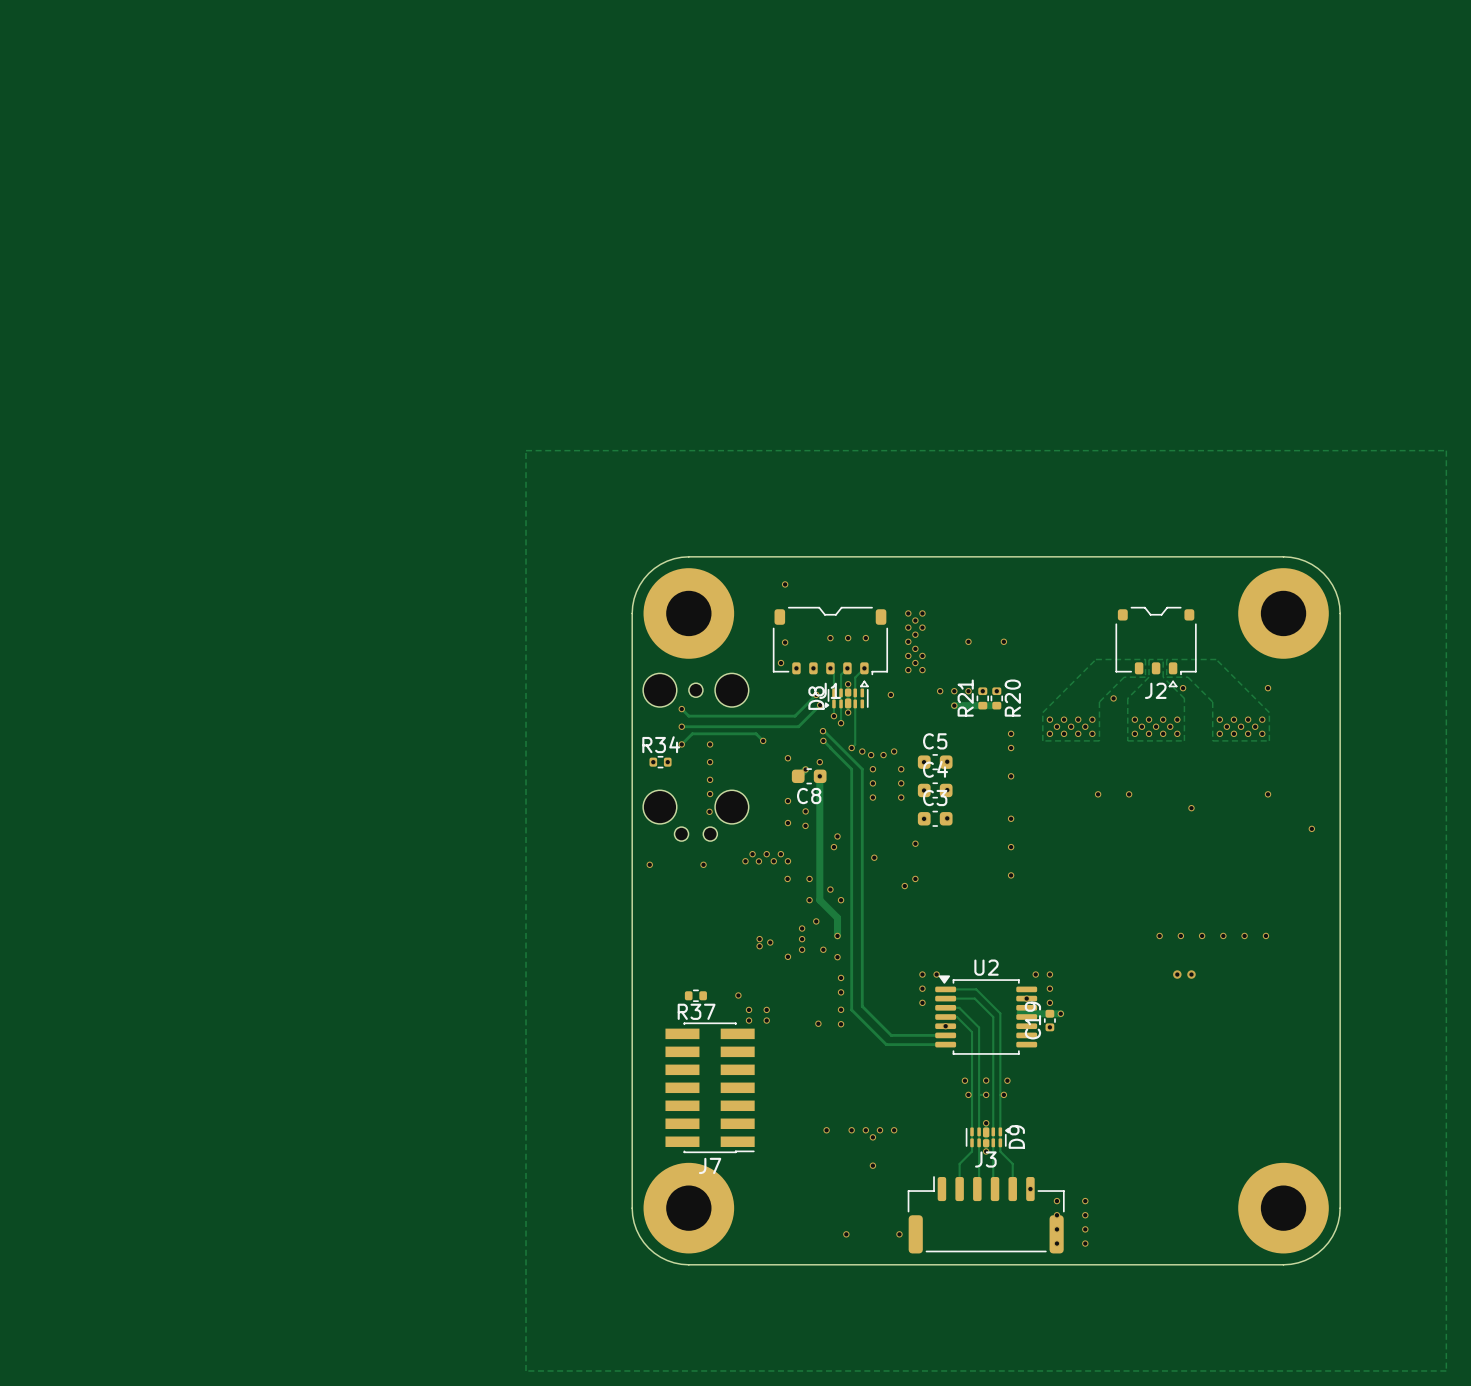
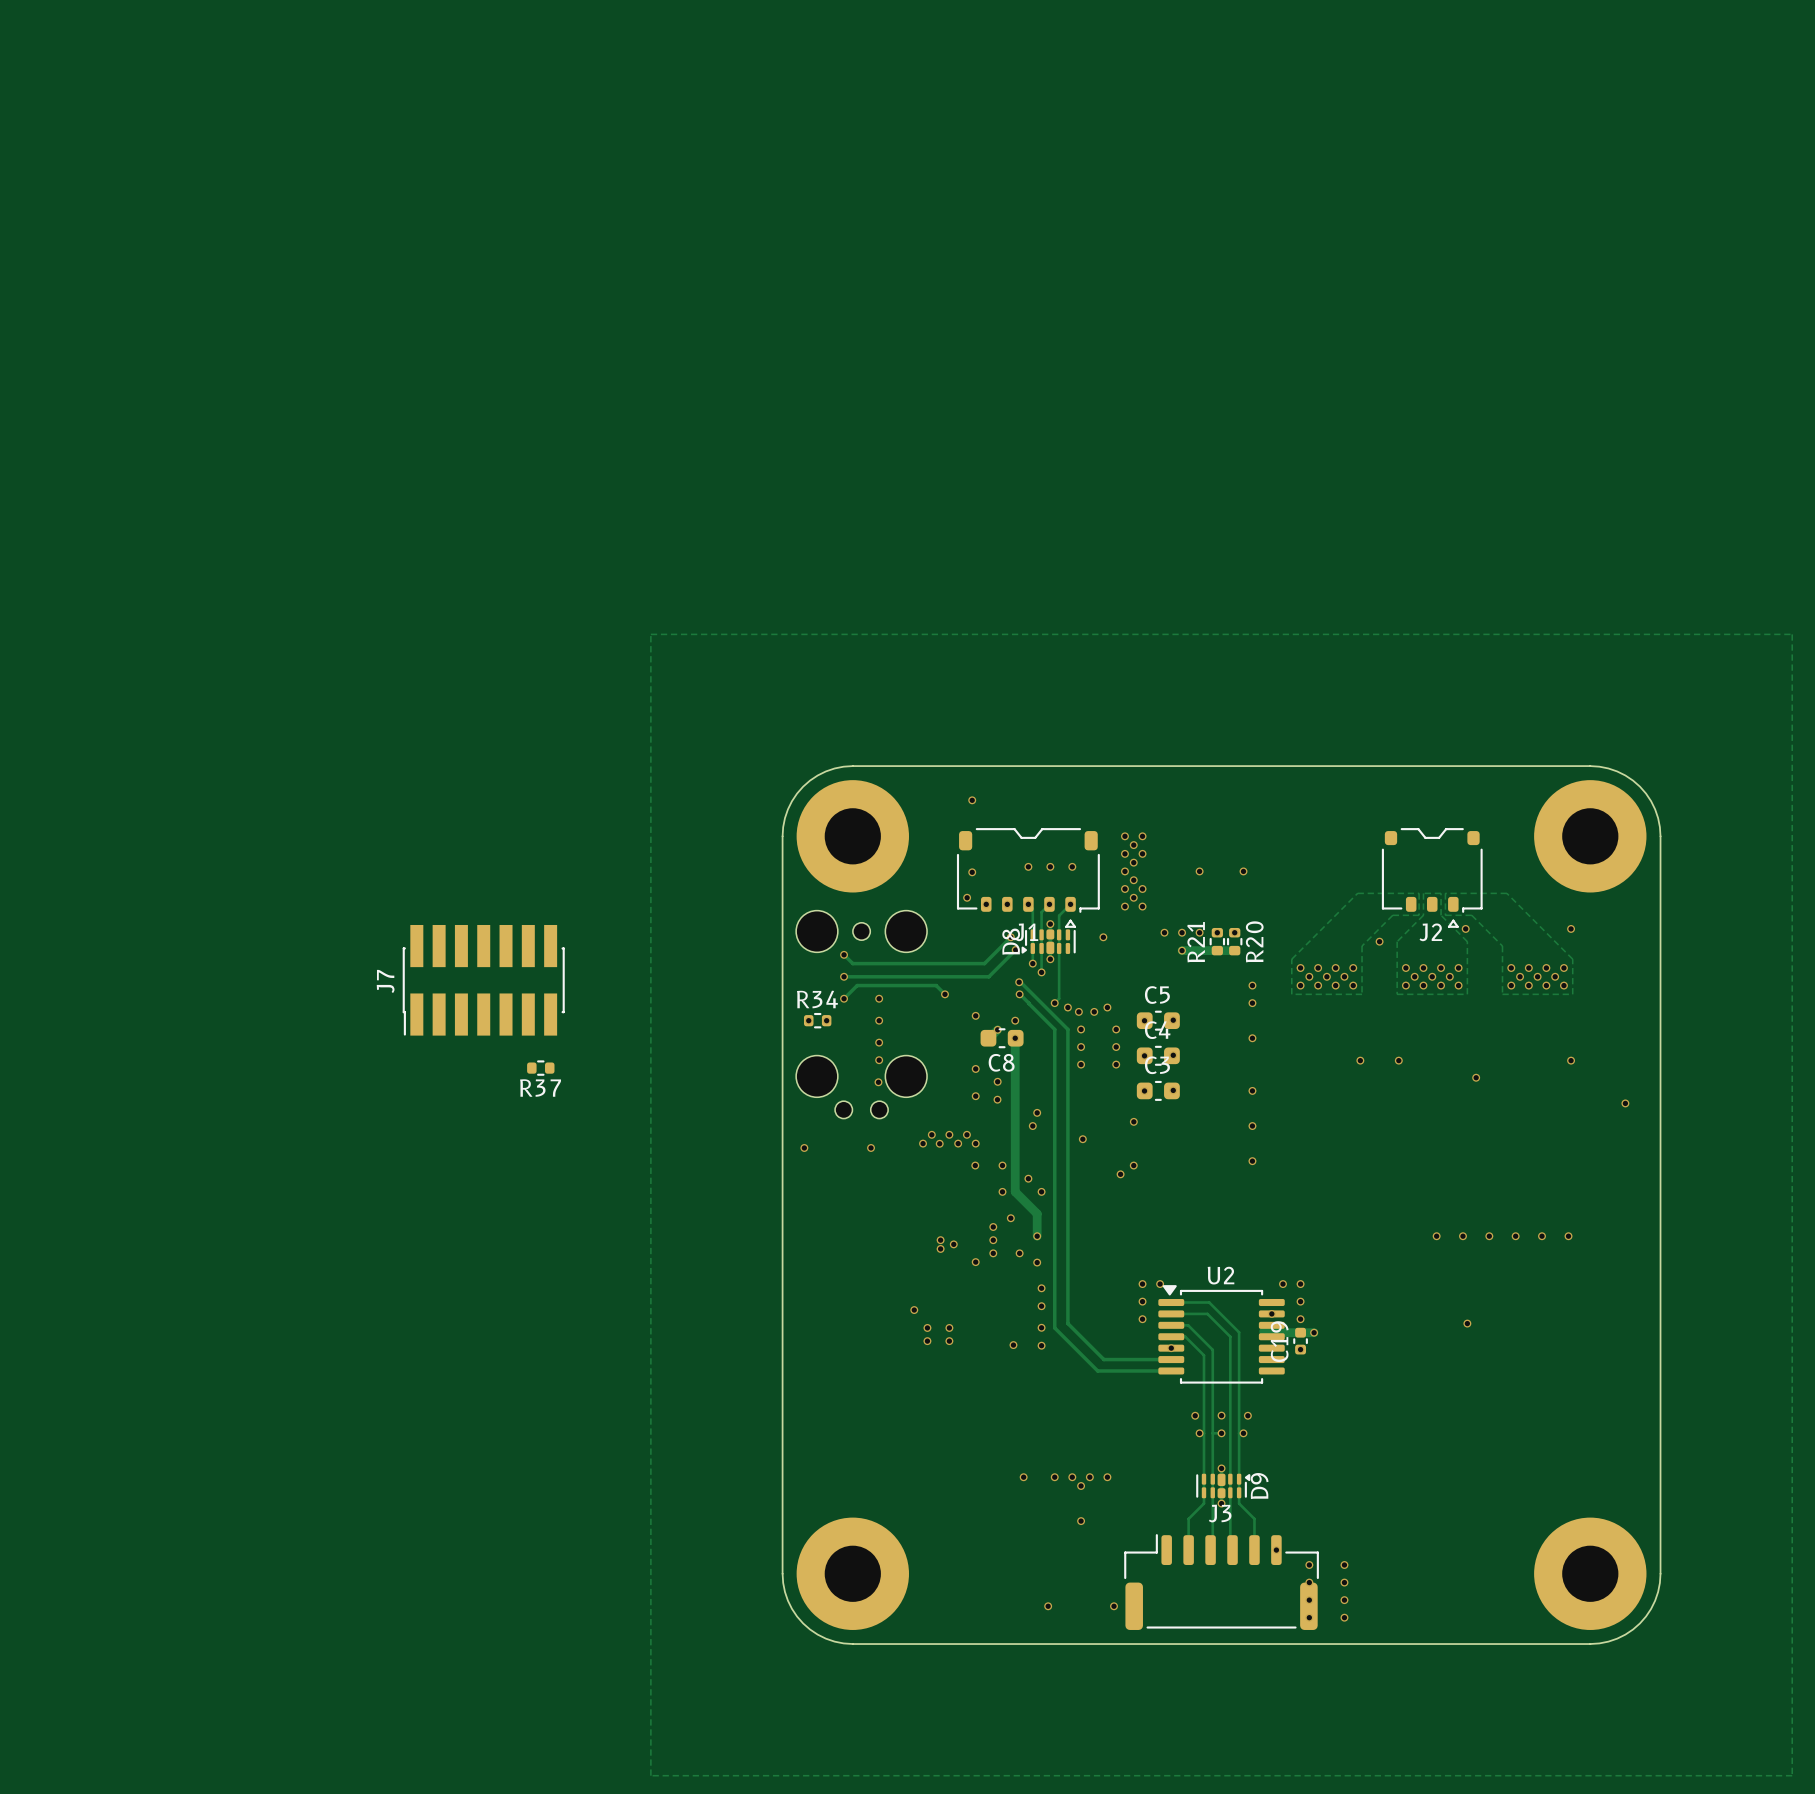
via: (1177, 974) -> none
via: (1191, 974) -> none
R37 position: (695, 995) -> (540, 1068)
via: none -> (1467, 1323)
J7 rotation: 0° (710, 1087) -> 90° clockwise (483, 980)
J7 position: (710, 1087) -> (483, 980)

